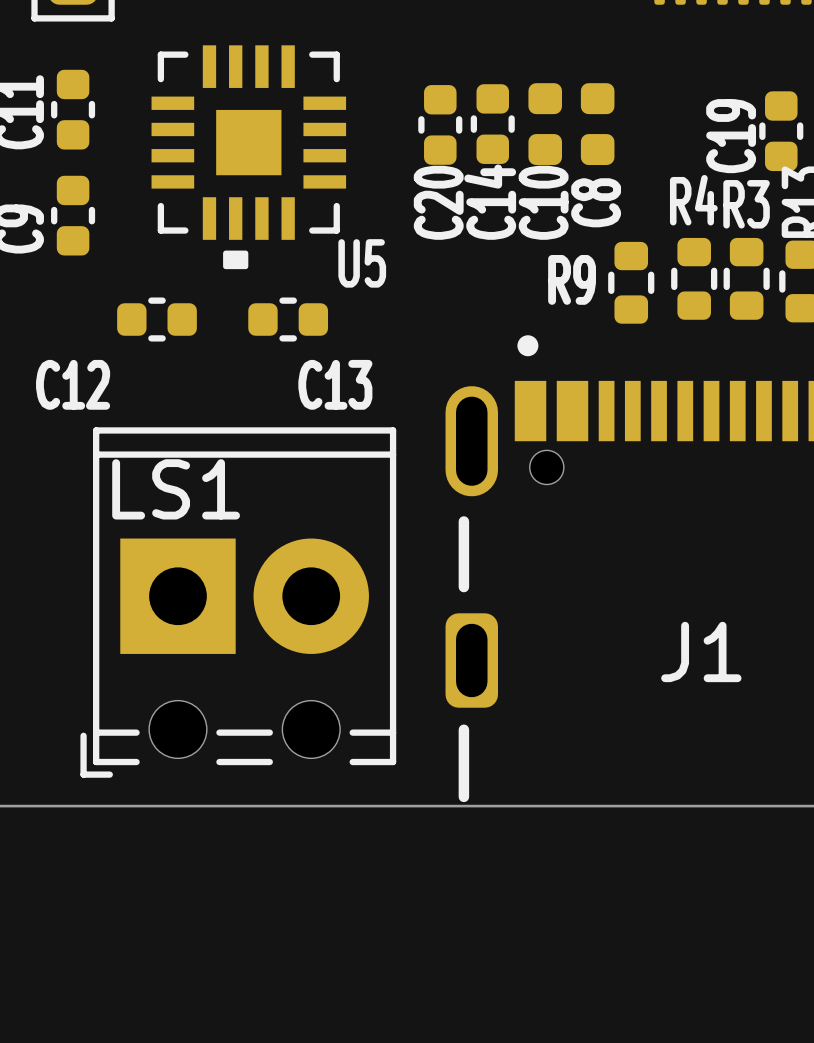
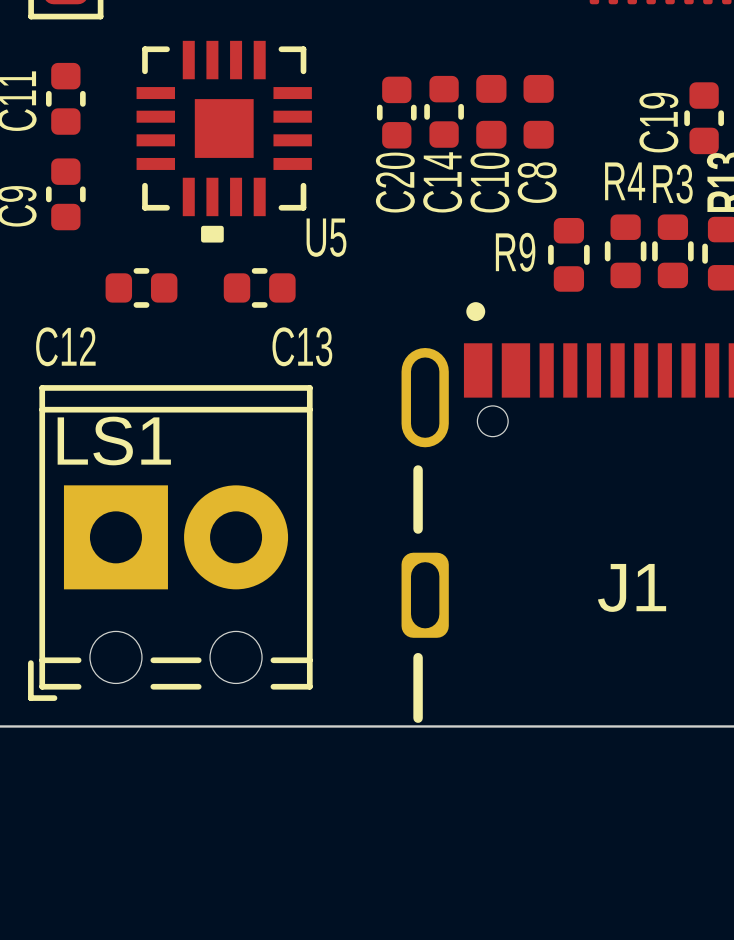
LS1 position: (238, 602) -> (170, 543)

